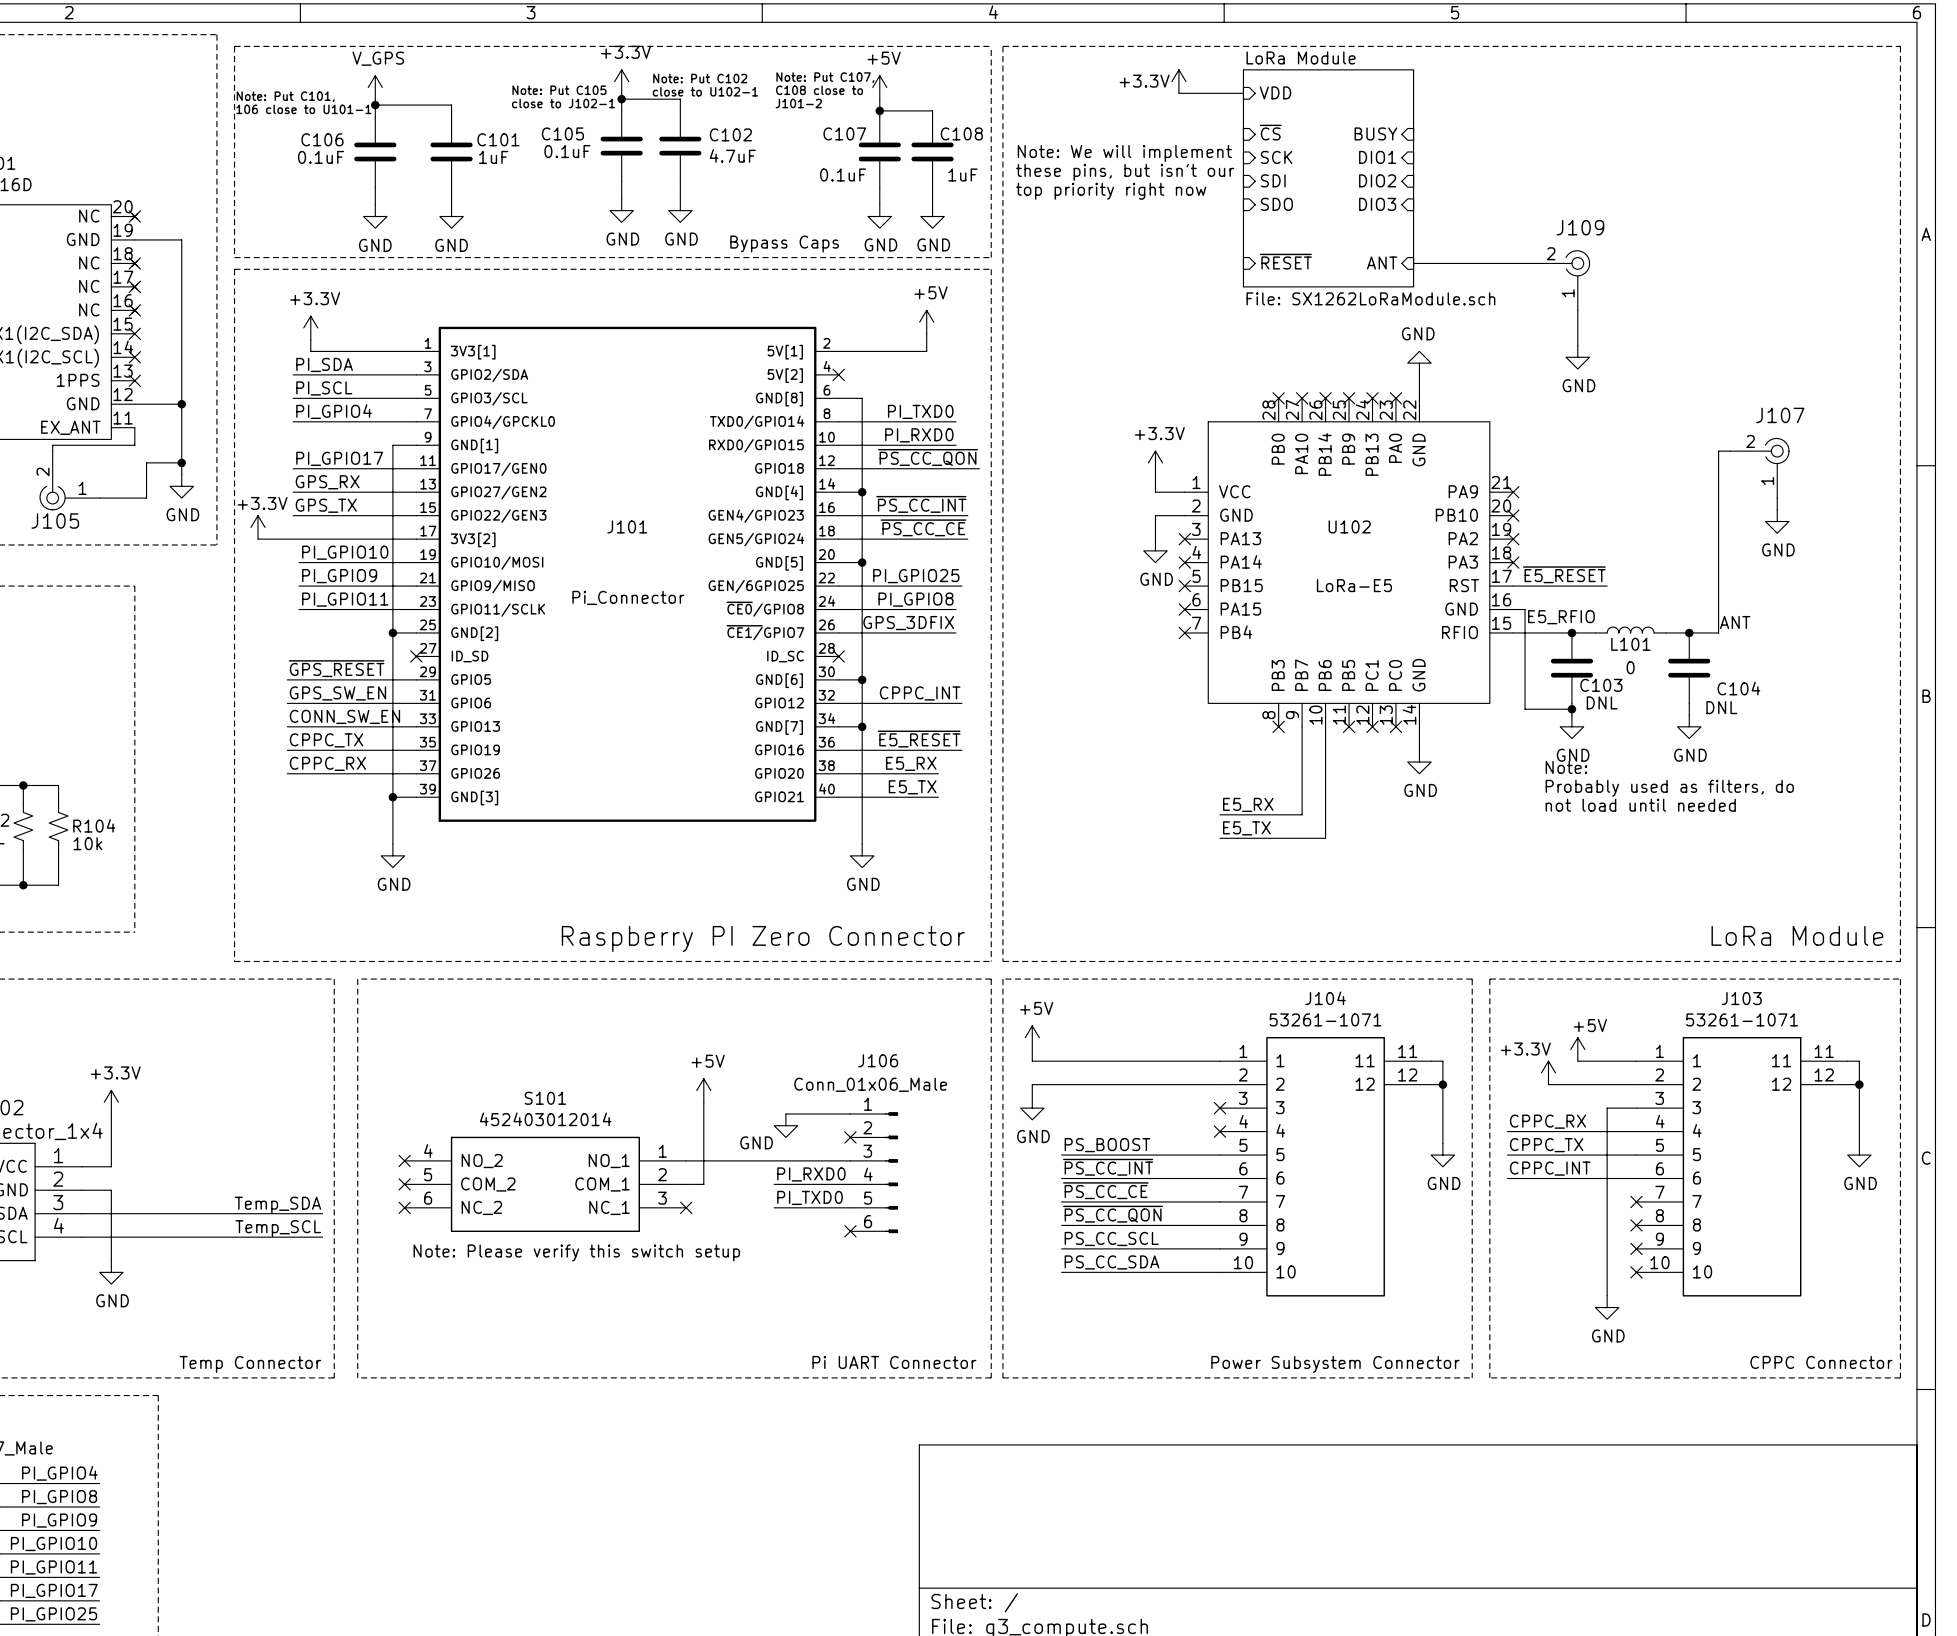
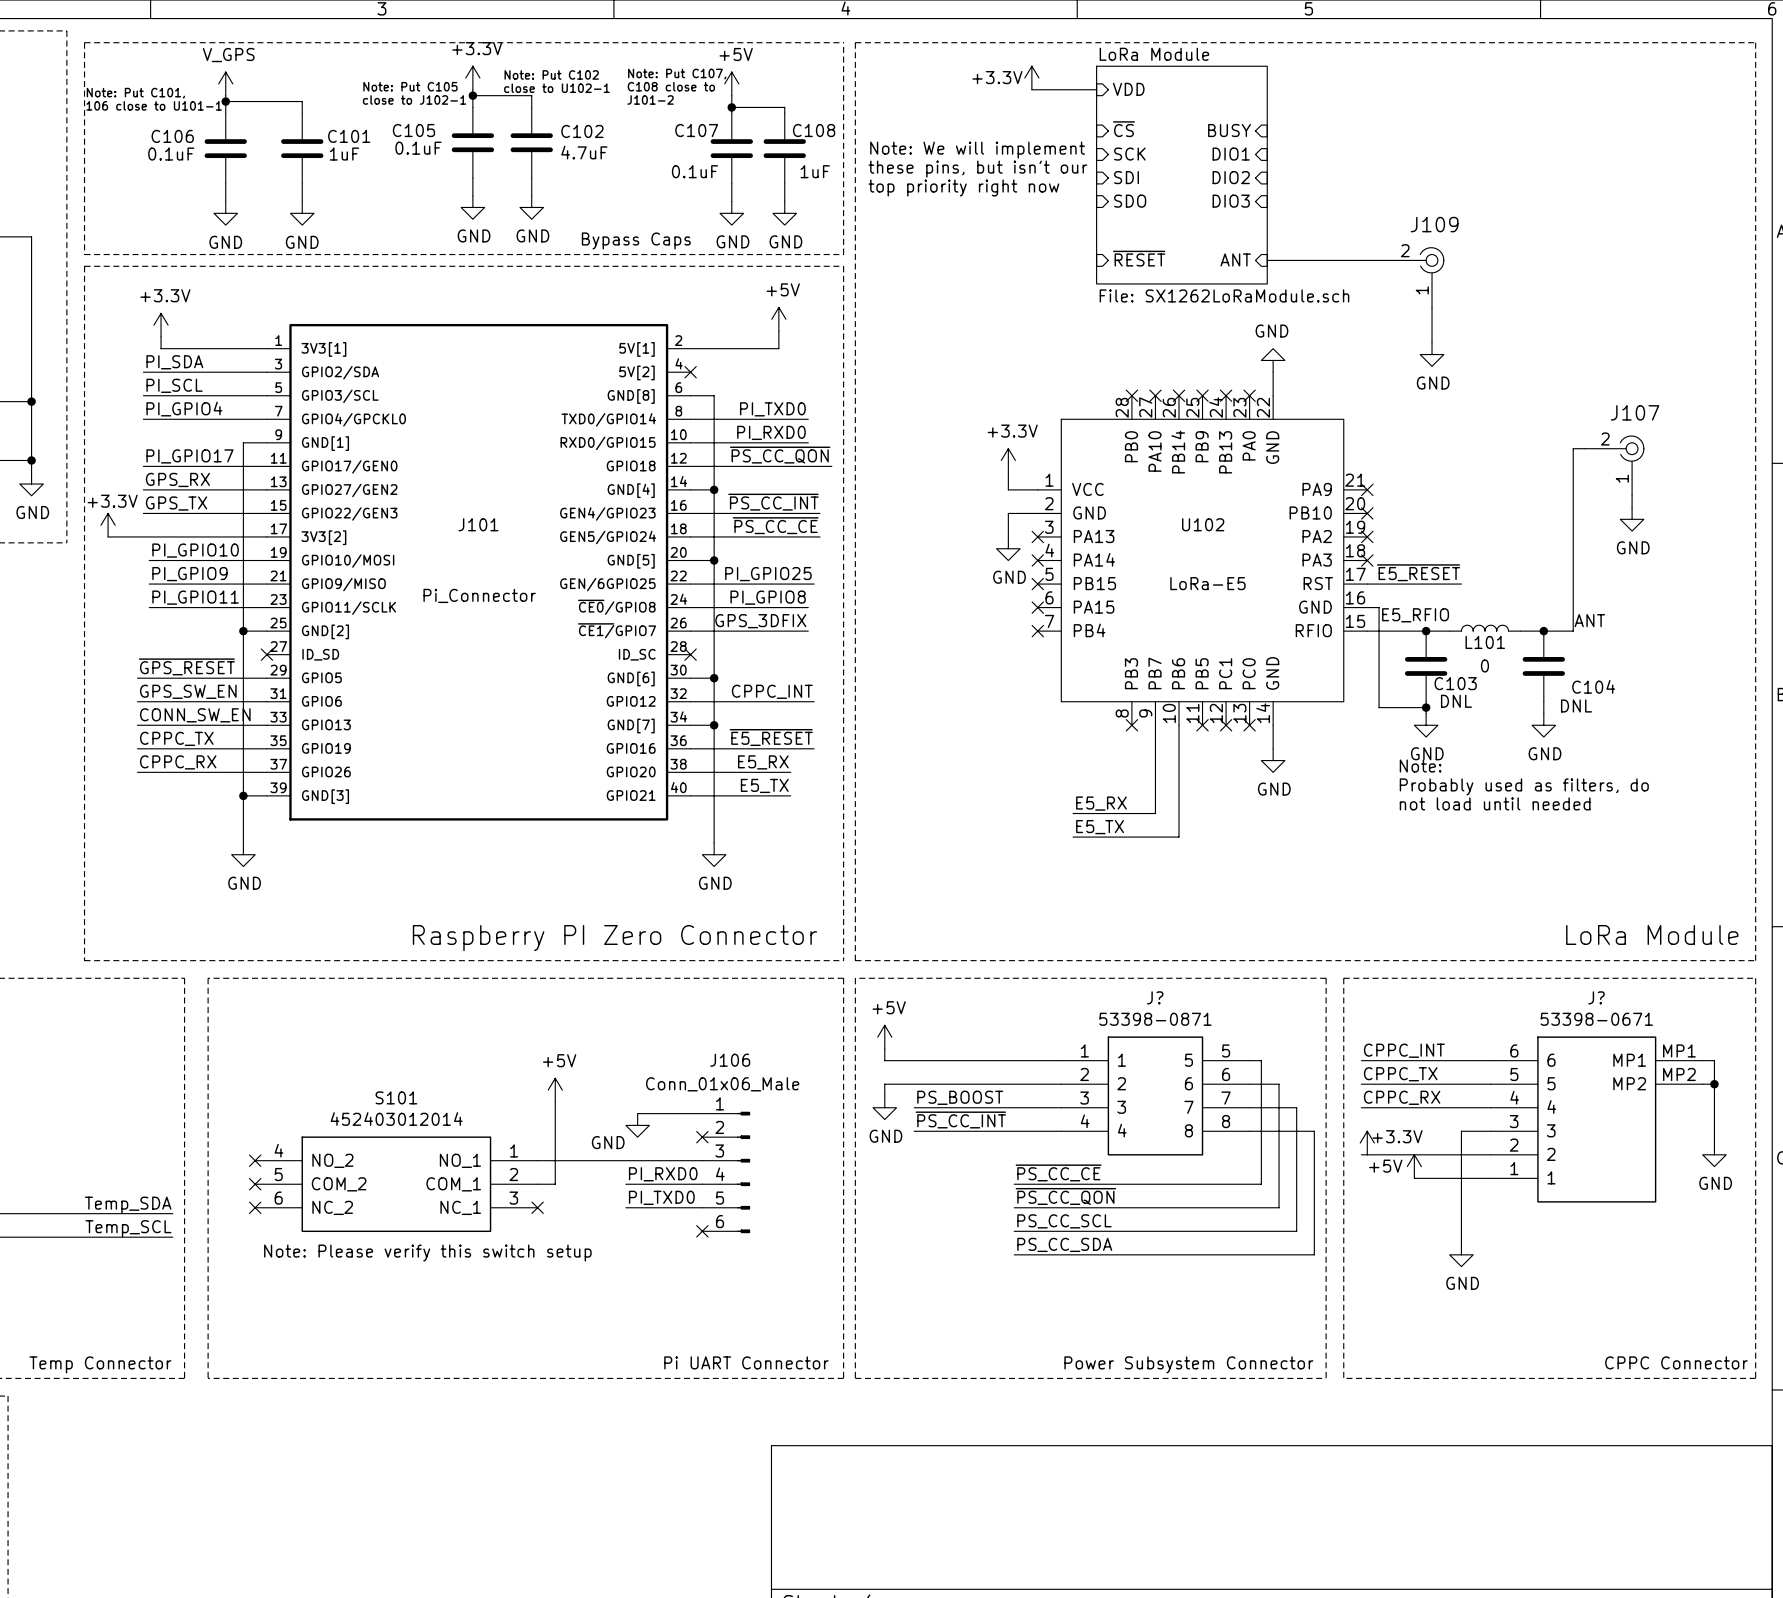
power symbol text position: +5V (1590, 1025) -> +5V (1385, 1166)
power symbol text position: +3.3V (1525, 1049) -> +3.3V (1397, 1136)
power symbol position: +5V (1577, 1049) -> +5V (1414, 1166)
wire: none -> (1249, 1060) (1261, 1060) (1261, 1184) (1014, 1184)
wire: (1431, 1061) (1442, 1061) (1442, 1108) -> (1249, 1107) (1296, 1107)
wire: none -> (1361, 1060) (1432, 1060)
power symbol position: +3.3V (1548, 1072) -> +3.3V (1367, 1143)
wire: none -> (1249, 1084) (1279, 1084) (1279, 1207) (1014, 1207)
wire: (1431, 1084) (1442, 1084) -> none
junction: (1442, 1084) -> none
wire: none -> (1361, 1084) (1402, 1084)
J?: none -> 53398-0871 (1155, 1095)
wire: none -> (914, 1107) (1061, 1107)
no-connect mark: (1219, 1108) -> none
wire: (1607, 1108) (1607, 1131) (1507, 1131) -> (1461, 1107) (1361, 1107)
J?: none -> 53398-0671 (1596, 1119)
label position: CPPC_RX (1548, 1121) -> CPPC_RX (1402, 1097)
wire: none -> (914, 1131) (1061, 1131)
no-connect mark: (1219, 1131) -> none
wire: none -> (1249, 1131) (1314, 1131) (1314, 1254) (1014, 1254)
wire: none -> (1296, 1143) (1296, 1231) (1014, 1231)
label position: PS_BOOST (1107, 1145) -> PS_BOOST (960, 1097)
label position: CPPC_TX (1546, 1145) -> CPPC_TX (1400, 1074)
wire: (1061, 1155) (1219, 1155) -> none
power symbol: GND (1442, 1155) -> none
J104: 53261-1071 (1325, 1166) -> none
J103: 53261-1071 (1742, 1166) -> none
label position: ~{PS_CC_INT} (1108, 1167) -> ~{PS_CC_INT} (960, 1119)
label position: CPPC_INT (1550, 1168) -> CPPC_INT (1404, 1050)
wire: (1061, 1178) (1219, 1178) -> none
wire: (1507, 1178) (1560, 1178) -> none
label position: ~{PS_CC_CE} (1105, 1190) -> ~{PS_CC_CE} (1058, 1172)
wire: (1061, 1201) (1219, 1201) -> none
no-connect mark: (1636, 1201) -> none
label position: ~{PS_CC_QON} (1113, 1214) -> ~{PS_CC_QON} (1065, 1196)
wire: (1061, 1225) (1219, 1225) -> none
no-connect mark: (1636, 1225) -> none
label position: PS_CC_SCL (1111, 1238) -> PS_CC_SCL (1064, 1221)
wire: (1607, 1243) (1607, 1295) -> none
wire: (1061, 1248) (1219, 1248) -> none
no-connect mark: (1636, 1248) -> none
label position: PS_CC_SDA (1111, 1262) -> PS_CC_SDA (1064, 1244)
wire: (1061, 1272) (1219, 1272) -> none
no-connect mark: (1636, 1272) -> none
power symbol position: GND (1607, 1307) -> GND (1461, 1254)

